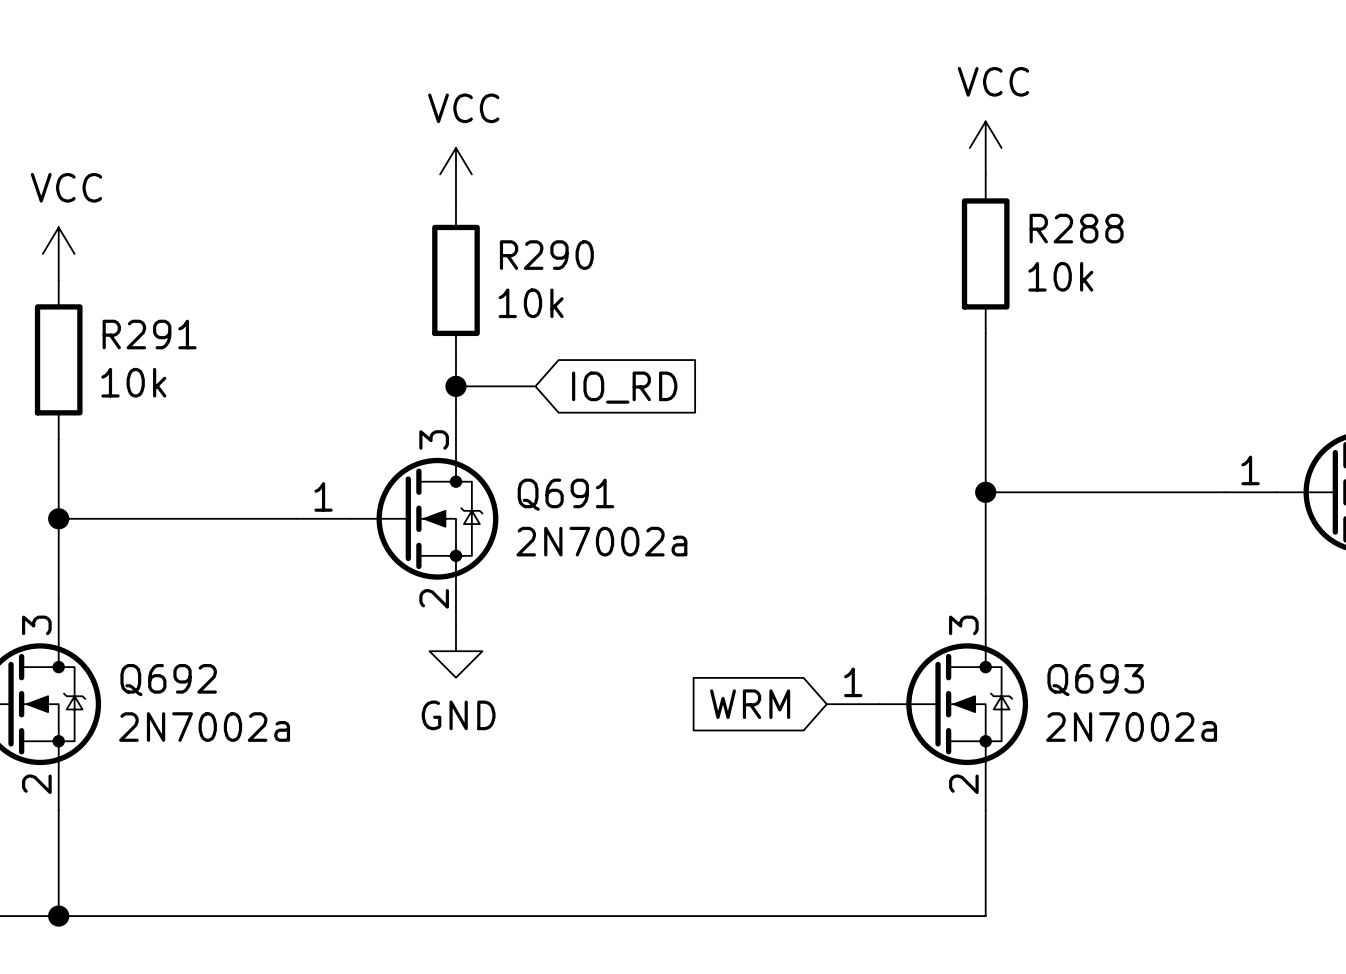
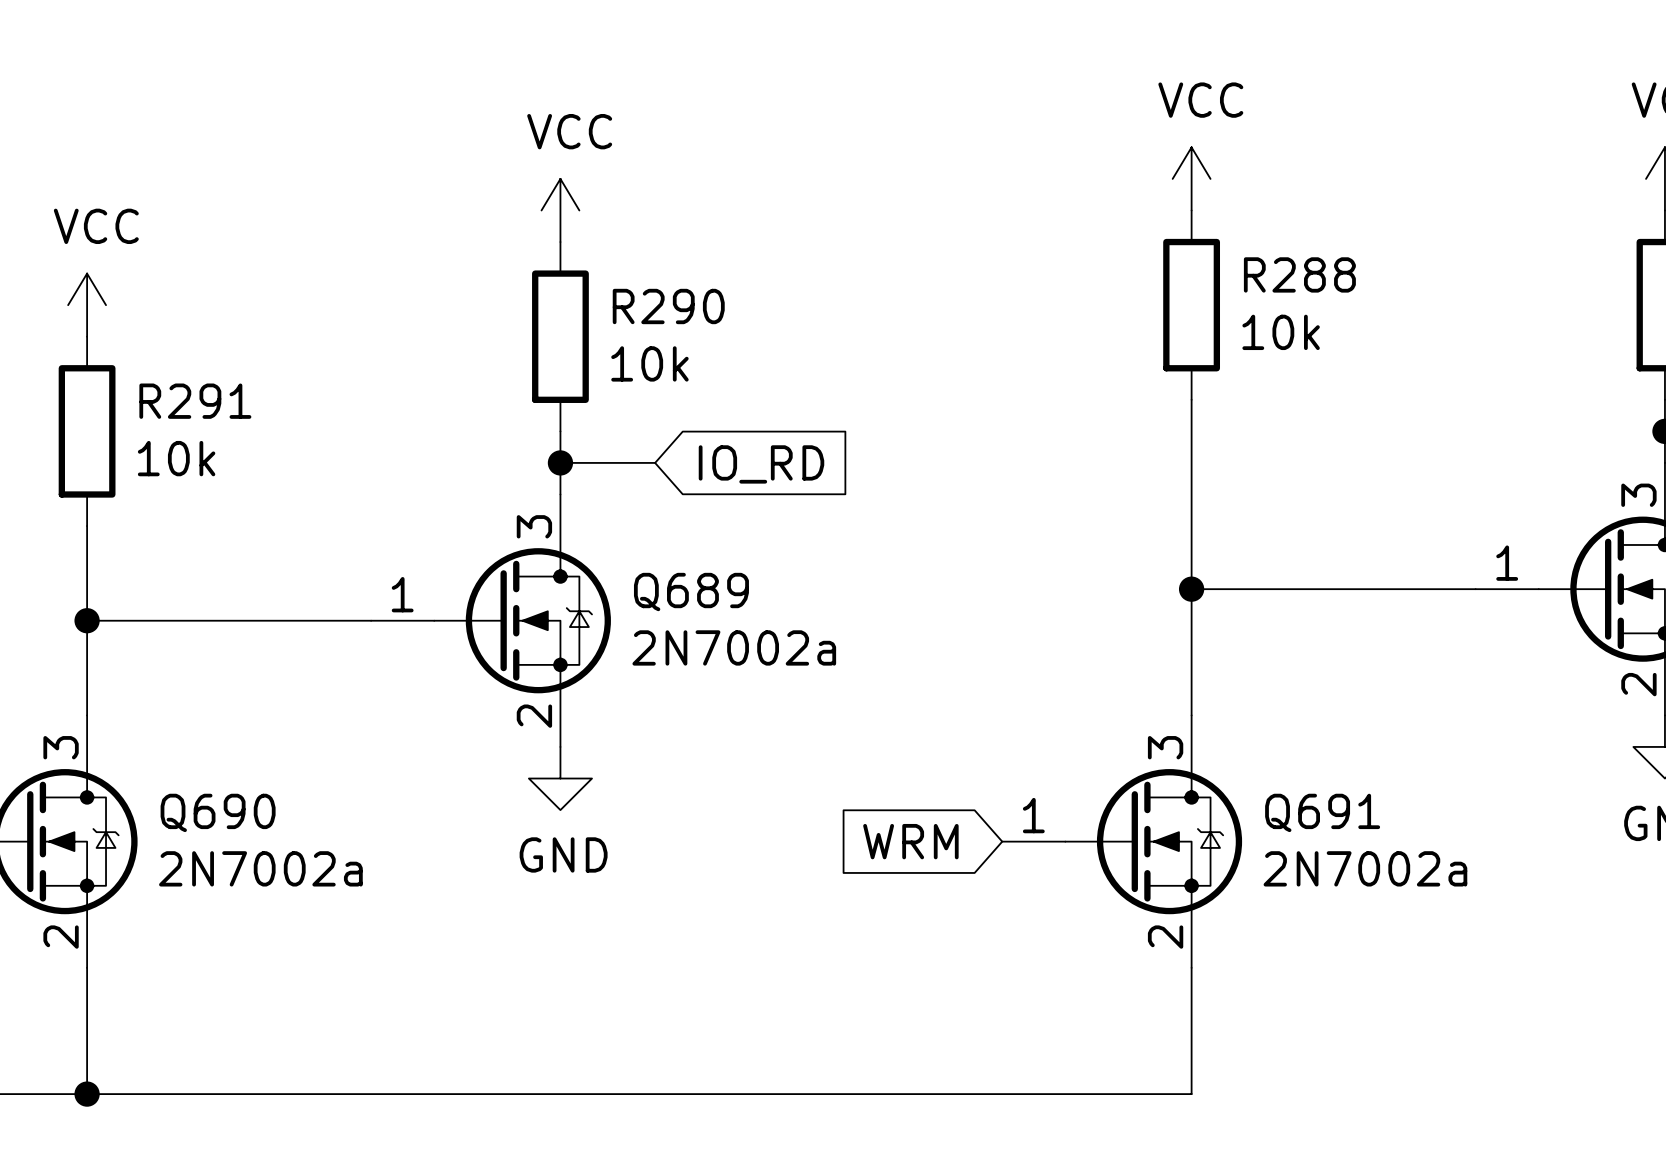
Q691 name: Q691 (565, 494) -> Q689 (691, 592)
Q692 name: Q692 (168, 680) -> Q690 (218, 812)
Q693 name: Q693 (1095, 680) -> Q691 (1322, 812)

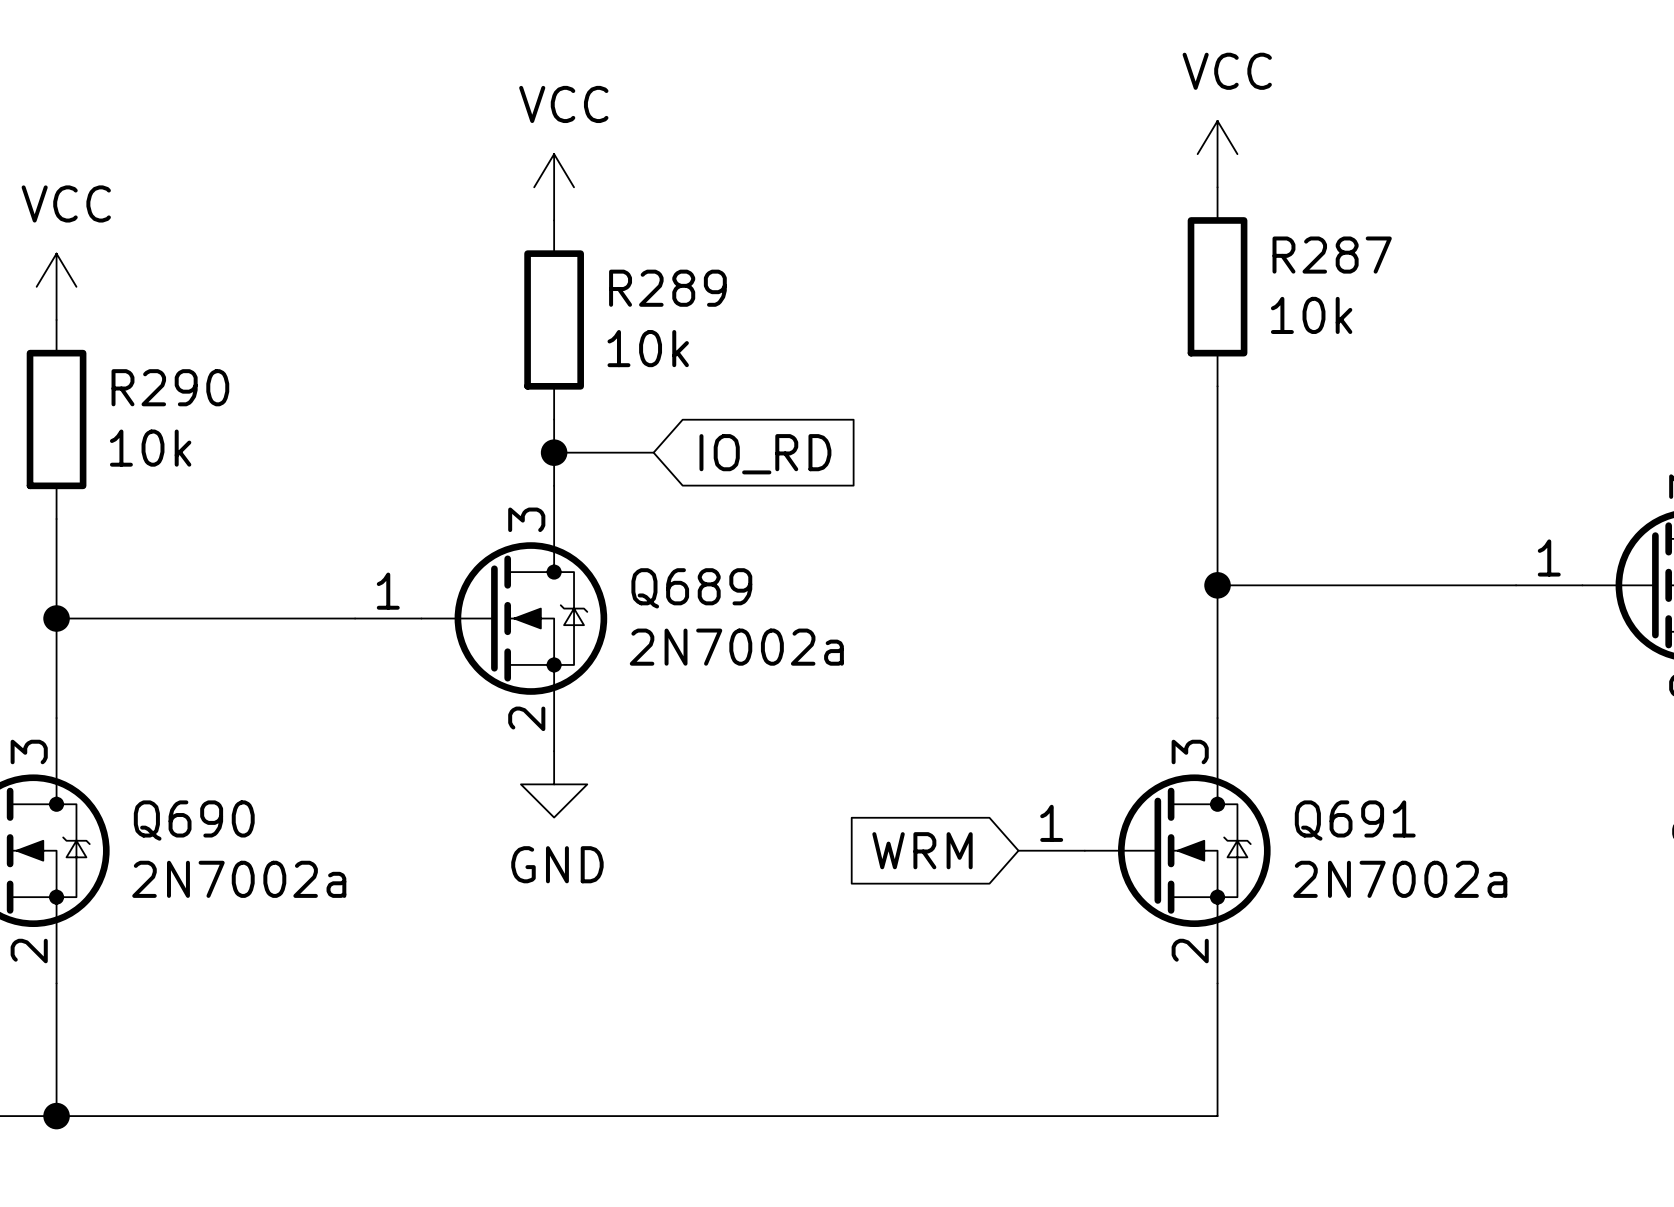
R288 name: R288 (1299, 274) -> R287 (1332, 255)
R290 name: R290 (668, 306) -> R289 (667, 288)
R291 name: R291 (195, 401) -> R290 (170, 387)

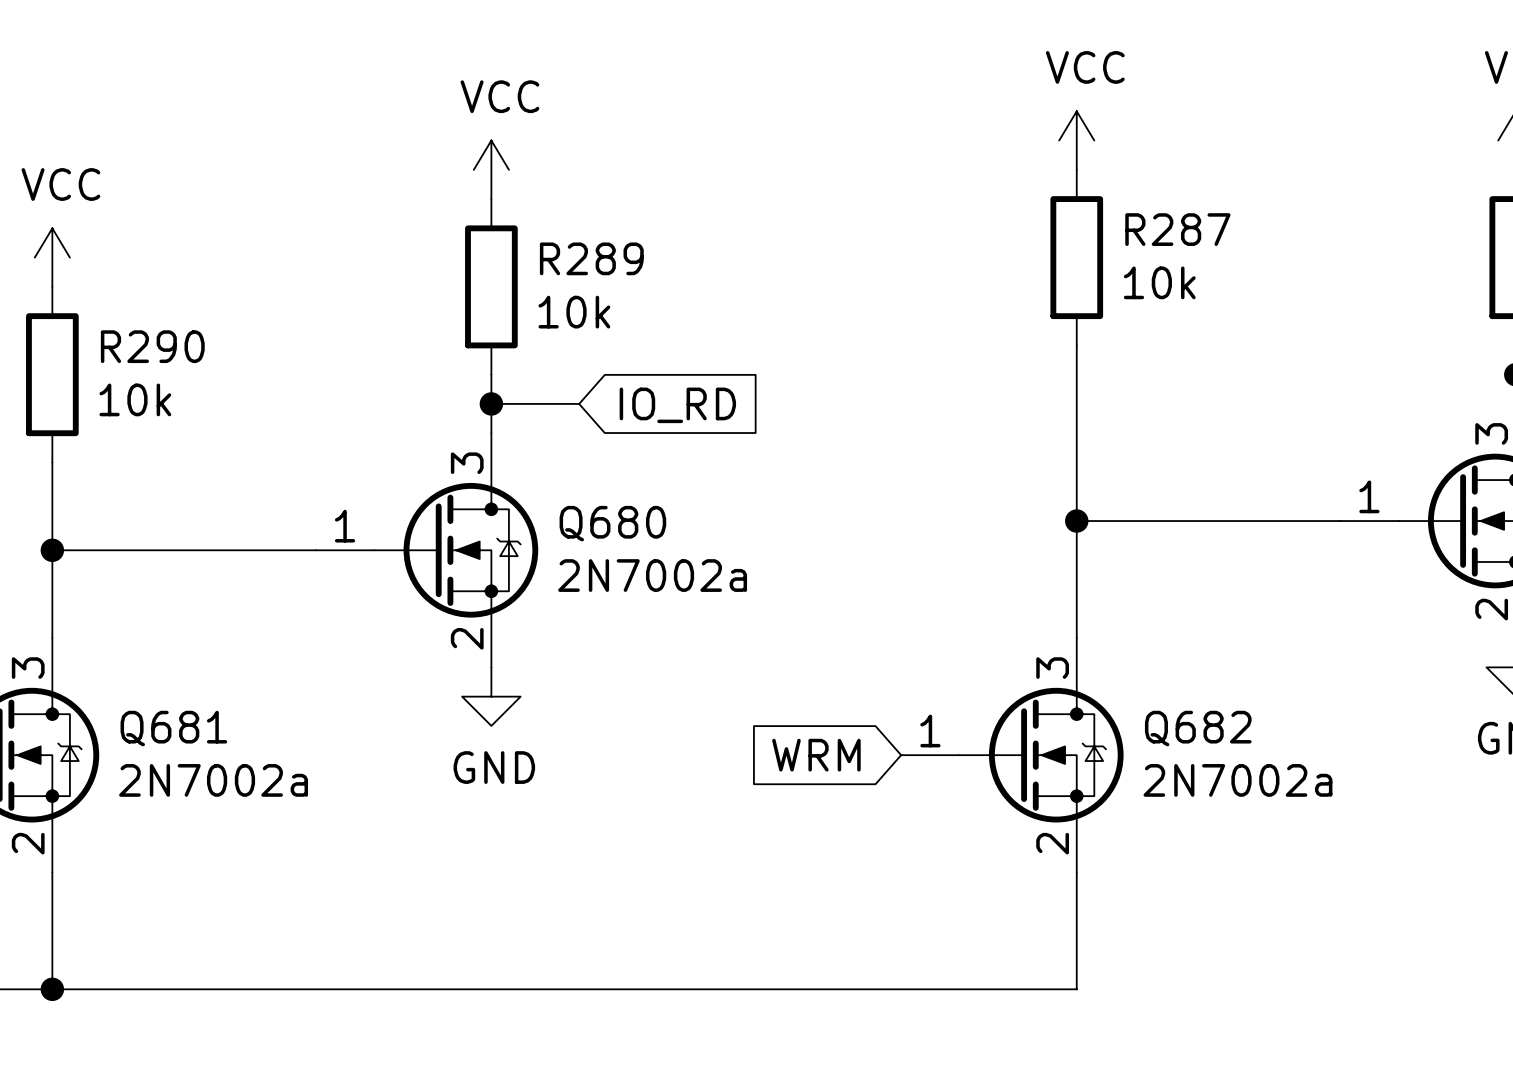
Q689 name: Q689 (691, 588) -> Q680 (612, 523)
Q690 name: Q690 (194, 820) -> Q681 (173, 728)
Q691 name: Q691 (1355, 820) -> Q682 (1198, 728)

